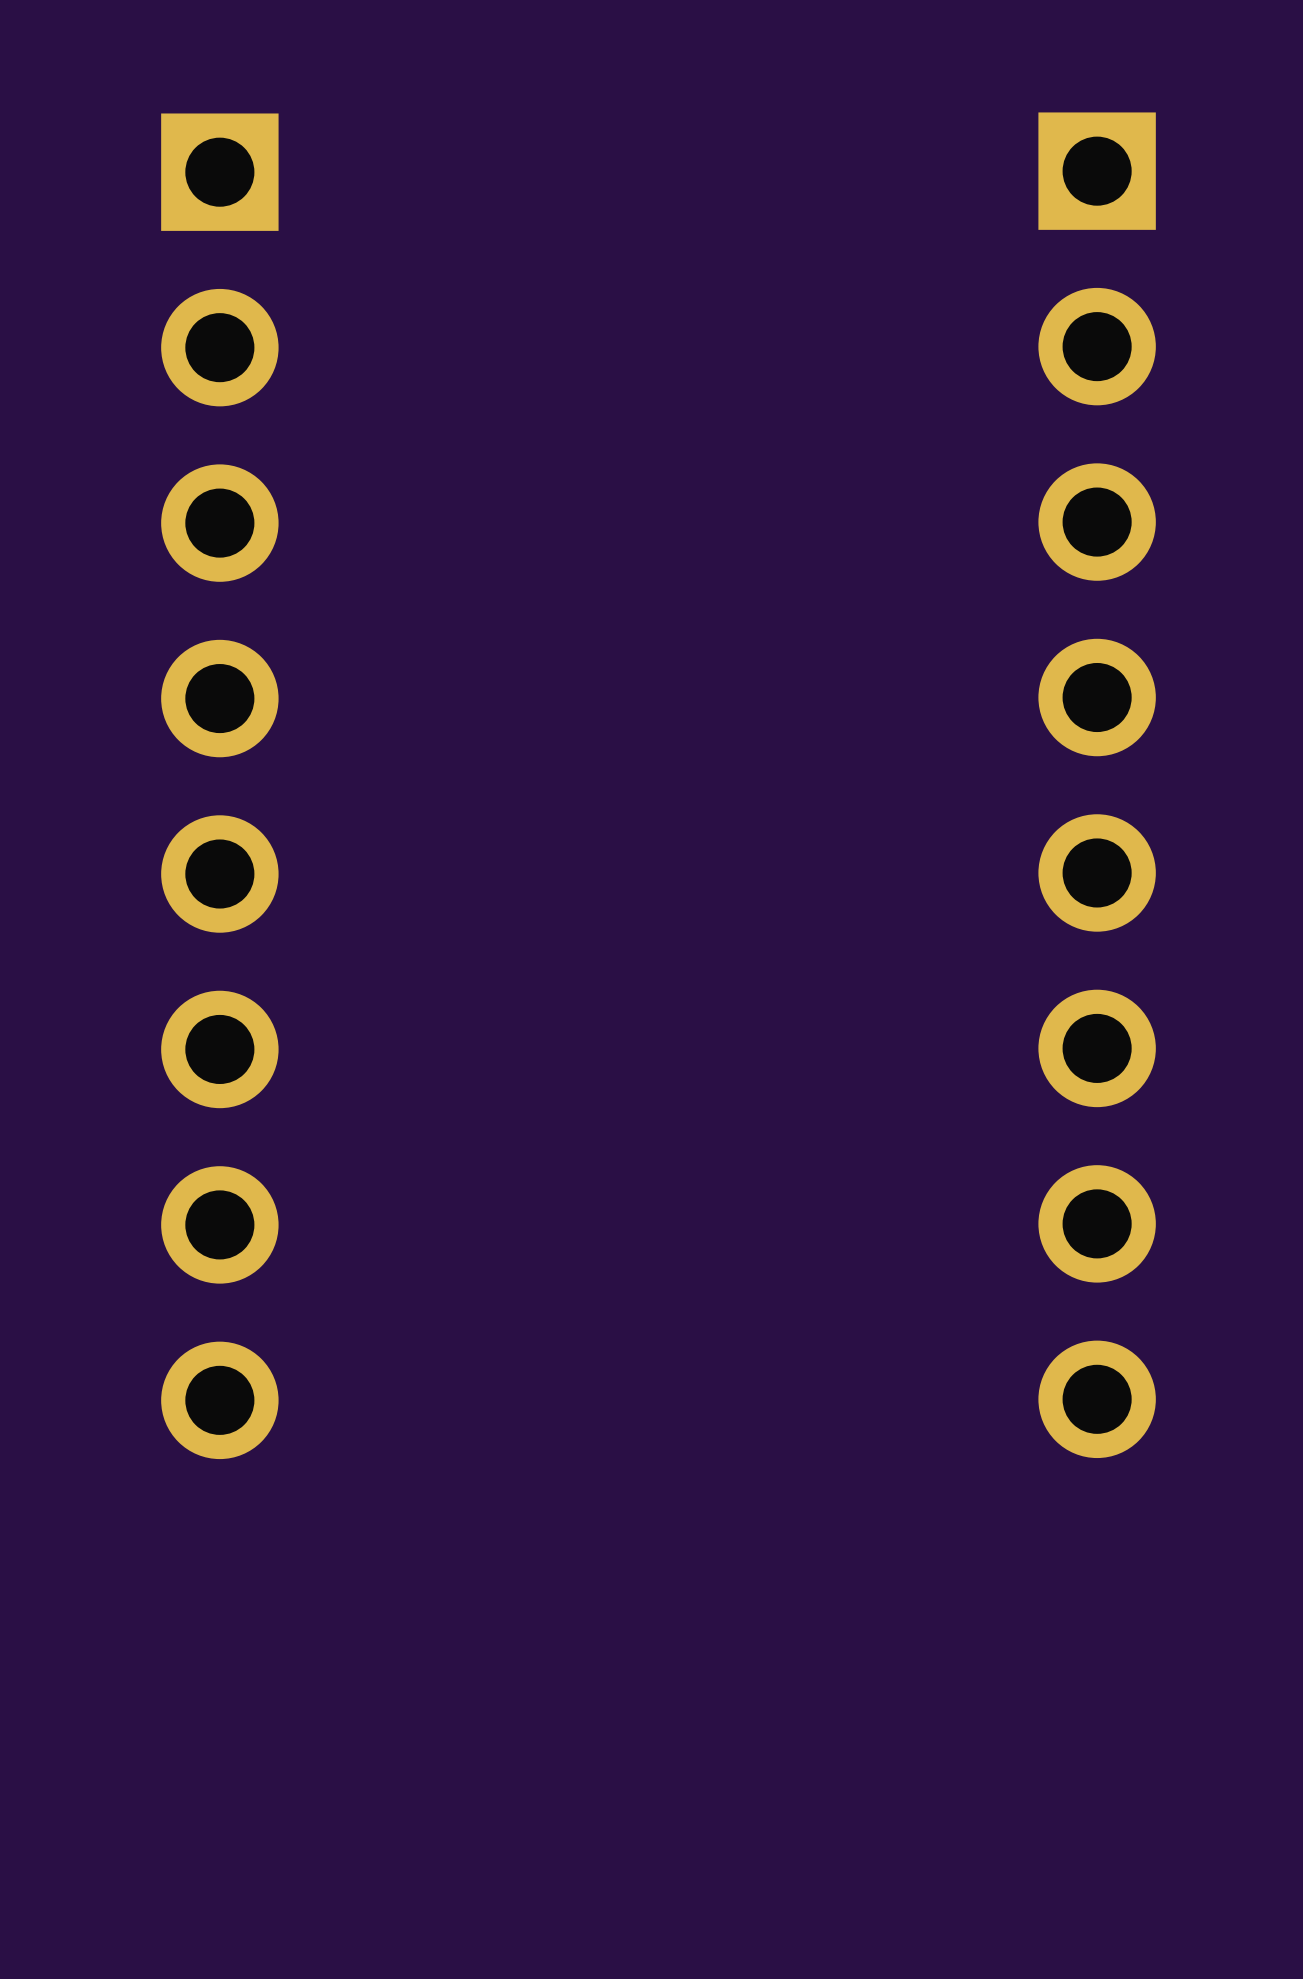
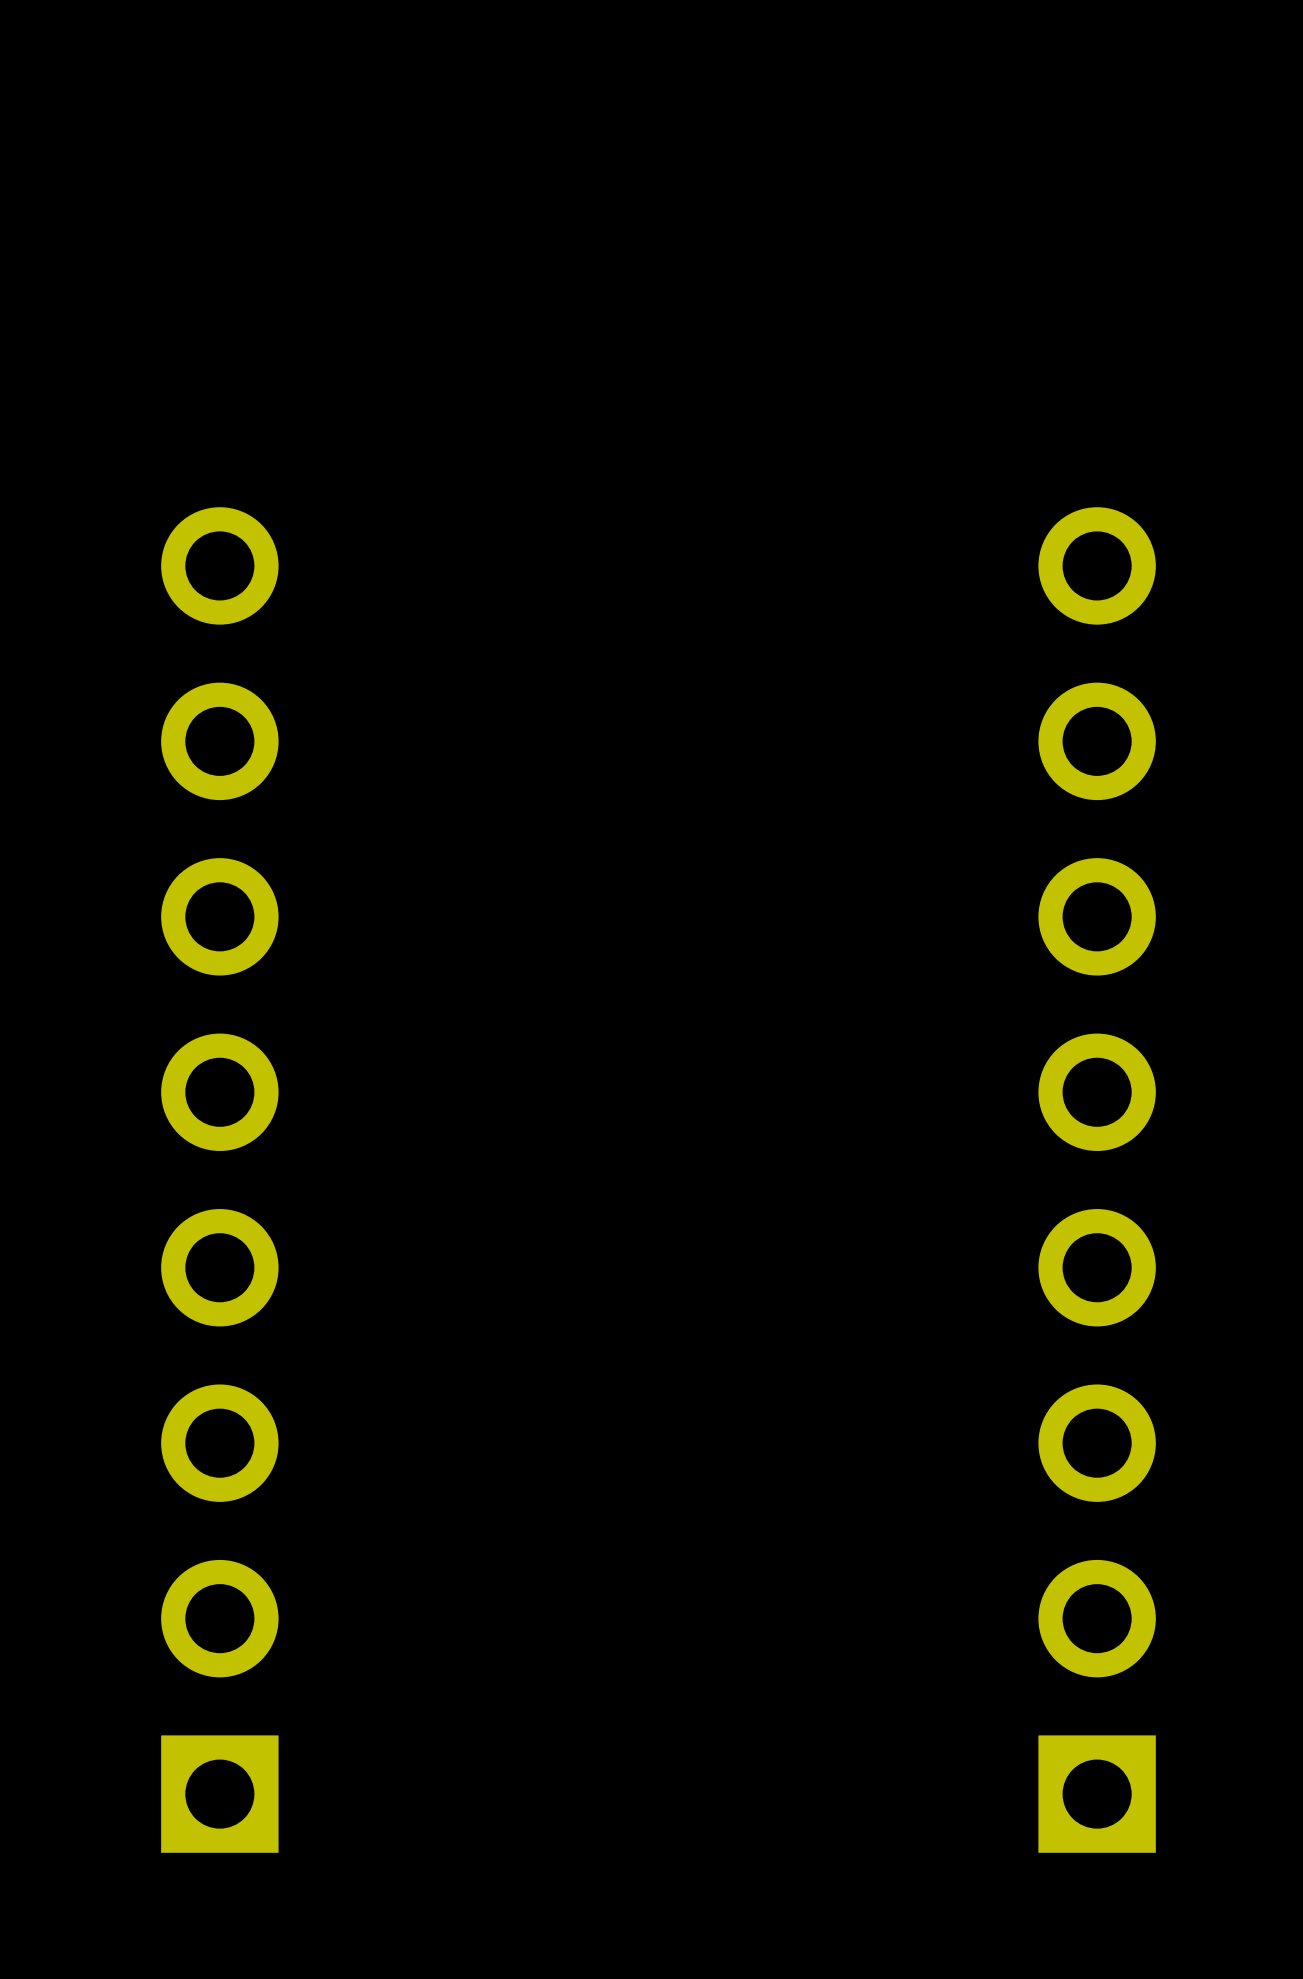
part rotation: 0° (1097, 785) -> 180° (1097, 1180)
part rotation: 0° (219, 786) -> 180° (219, 1180)

